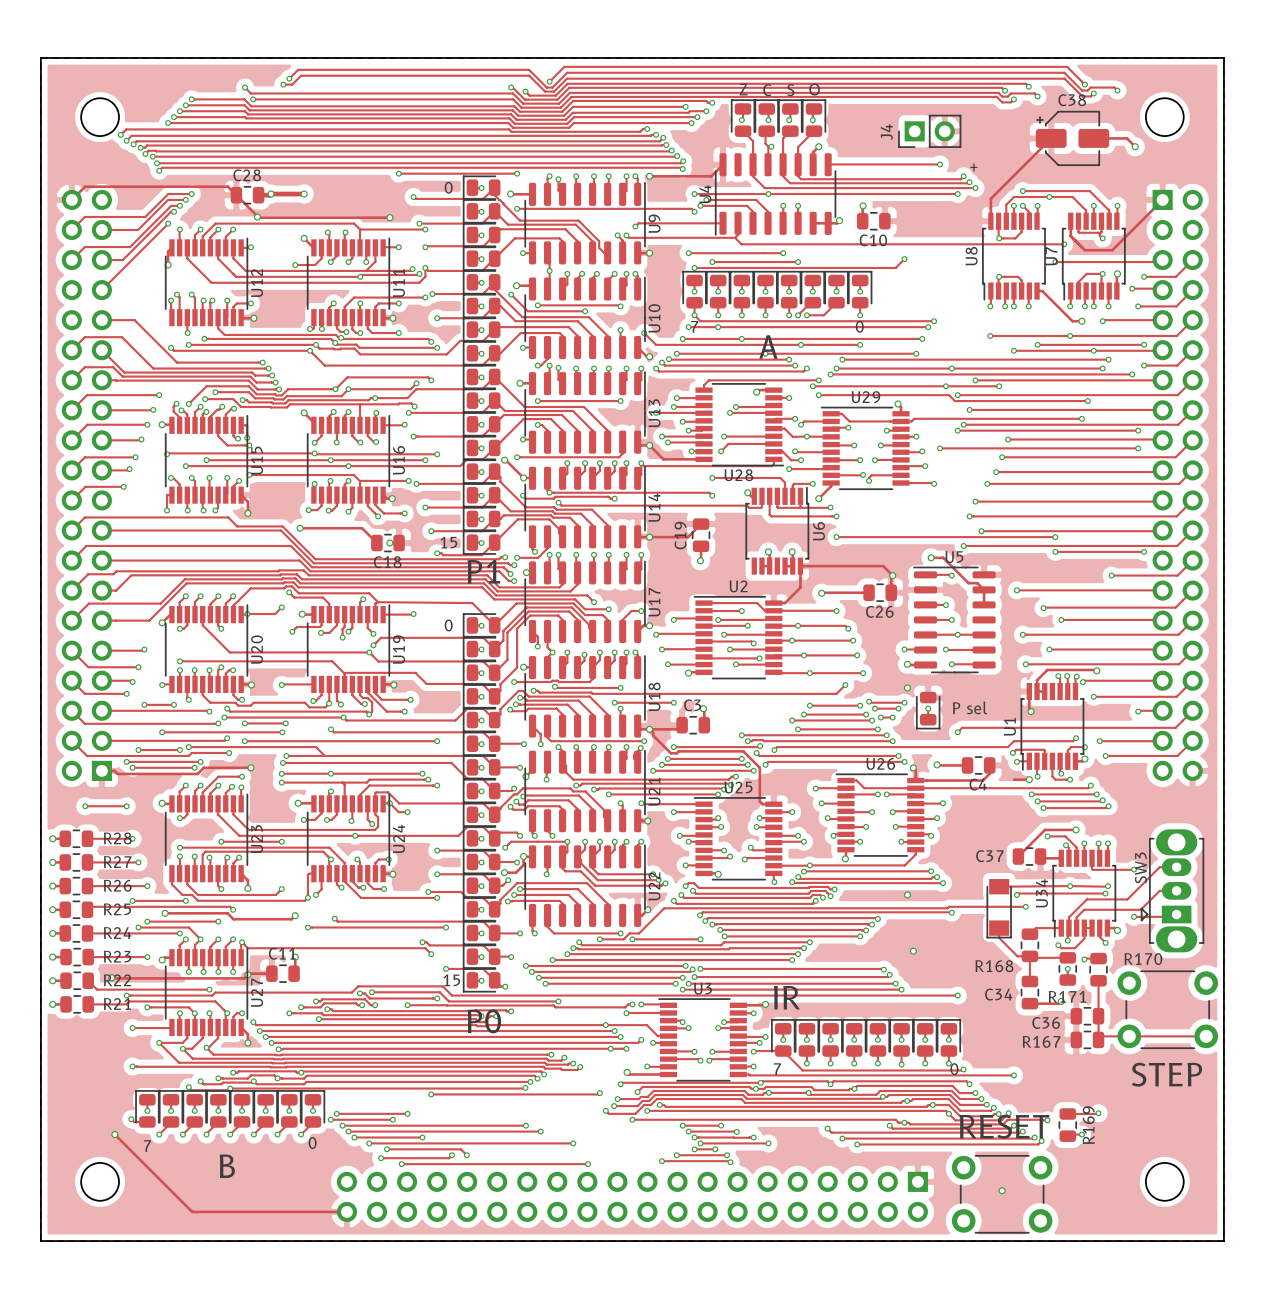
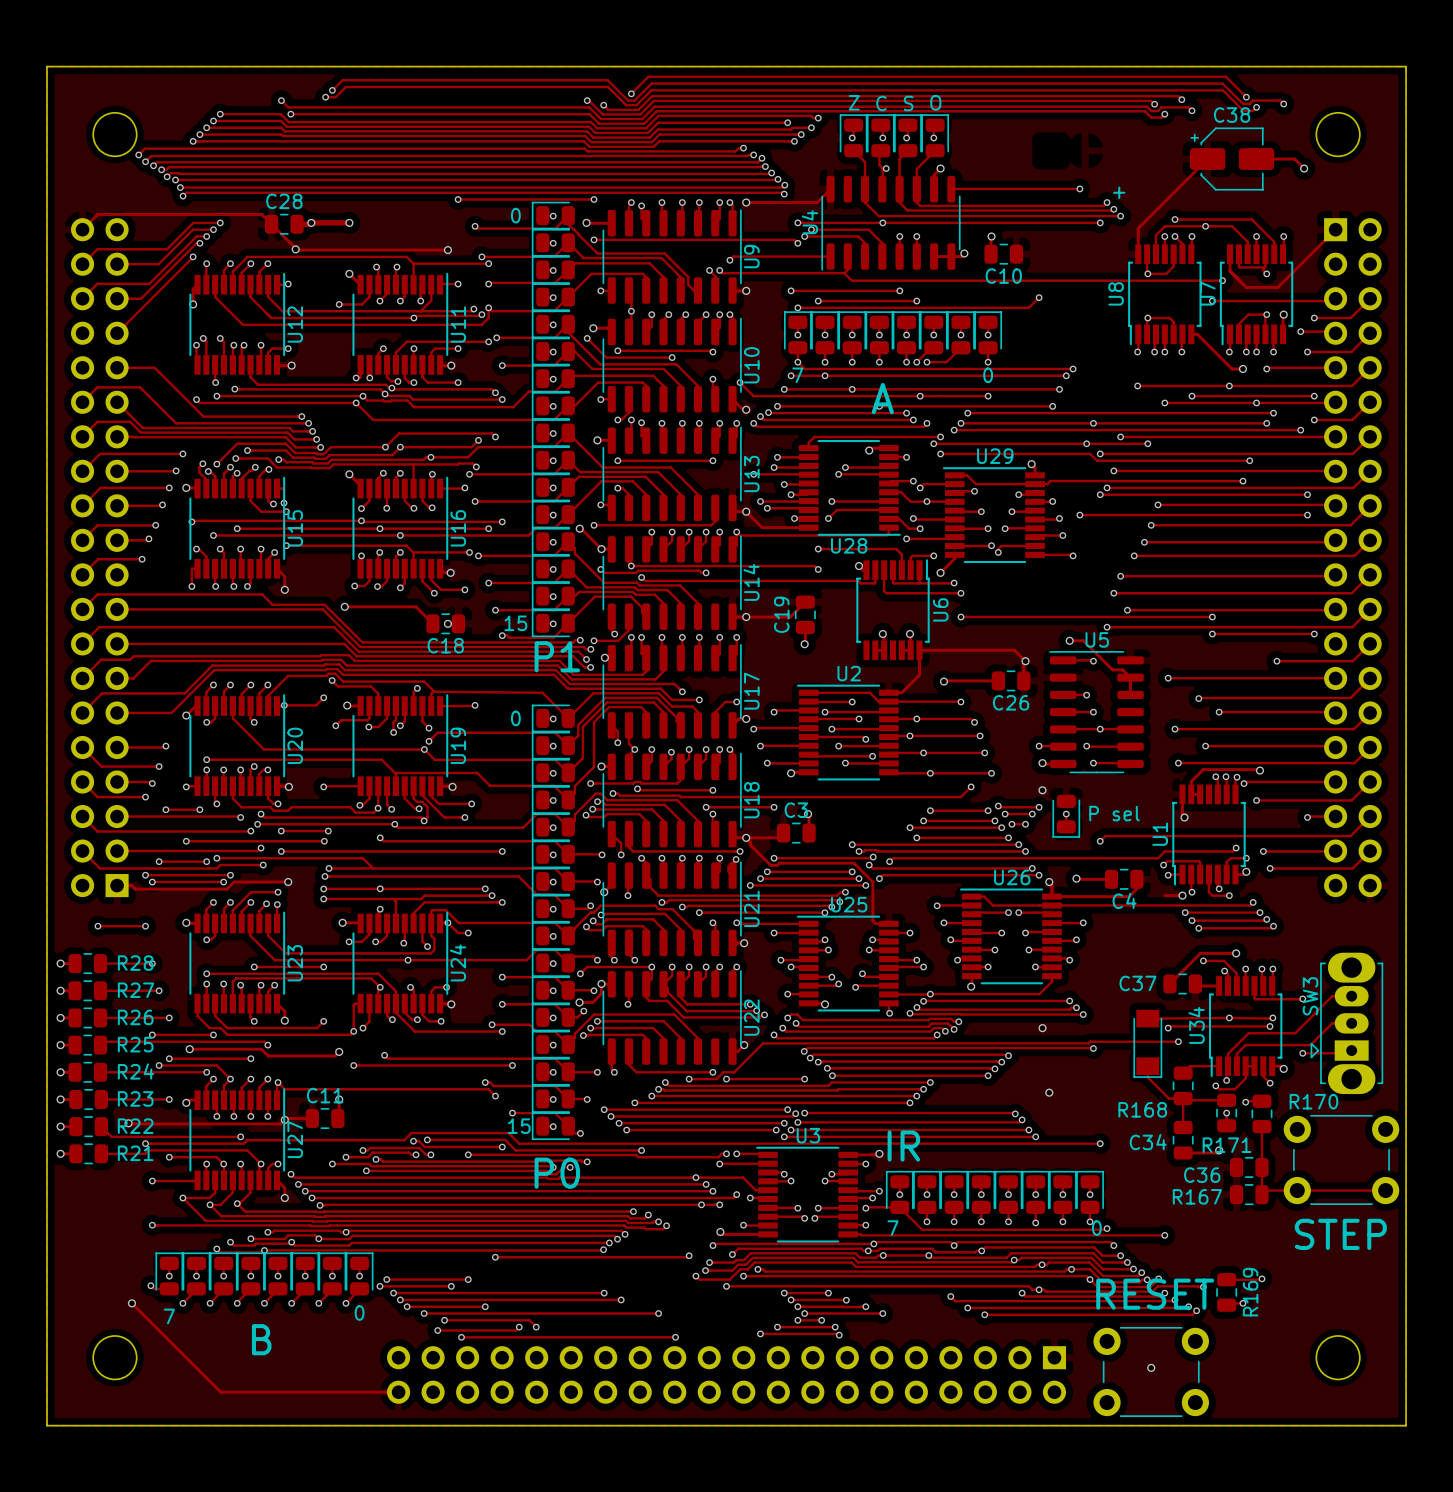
J4: (929, 131) -> none

